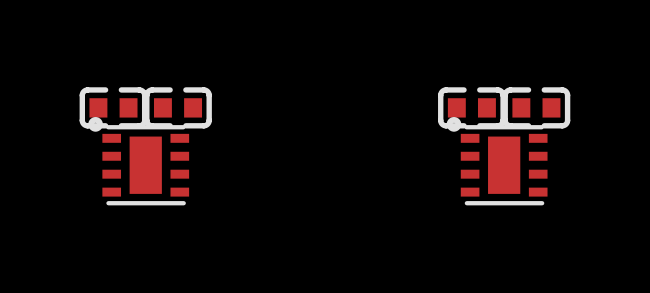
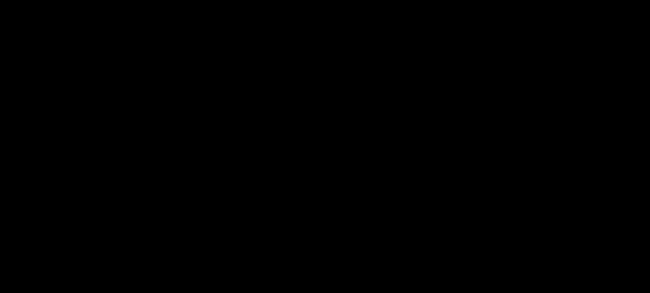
part: (113, 107) -> none
part: (178, 107) -> none
part: (471, 107) -> none
part: (536, 107) -> none
part: (138, 161) -> none
part: (497, 161) -> none

